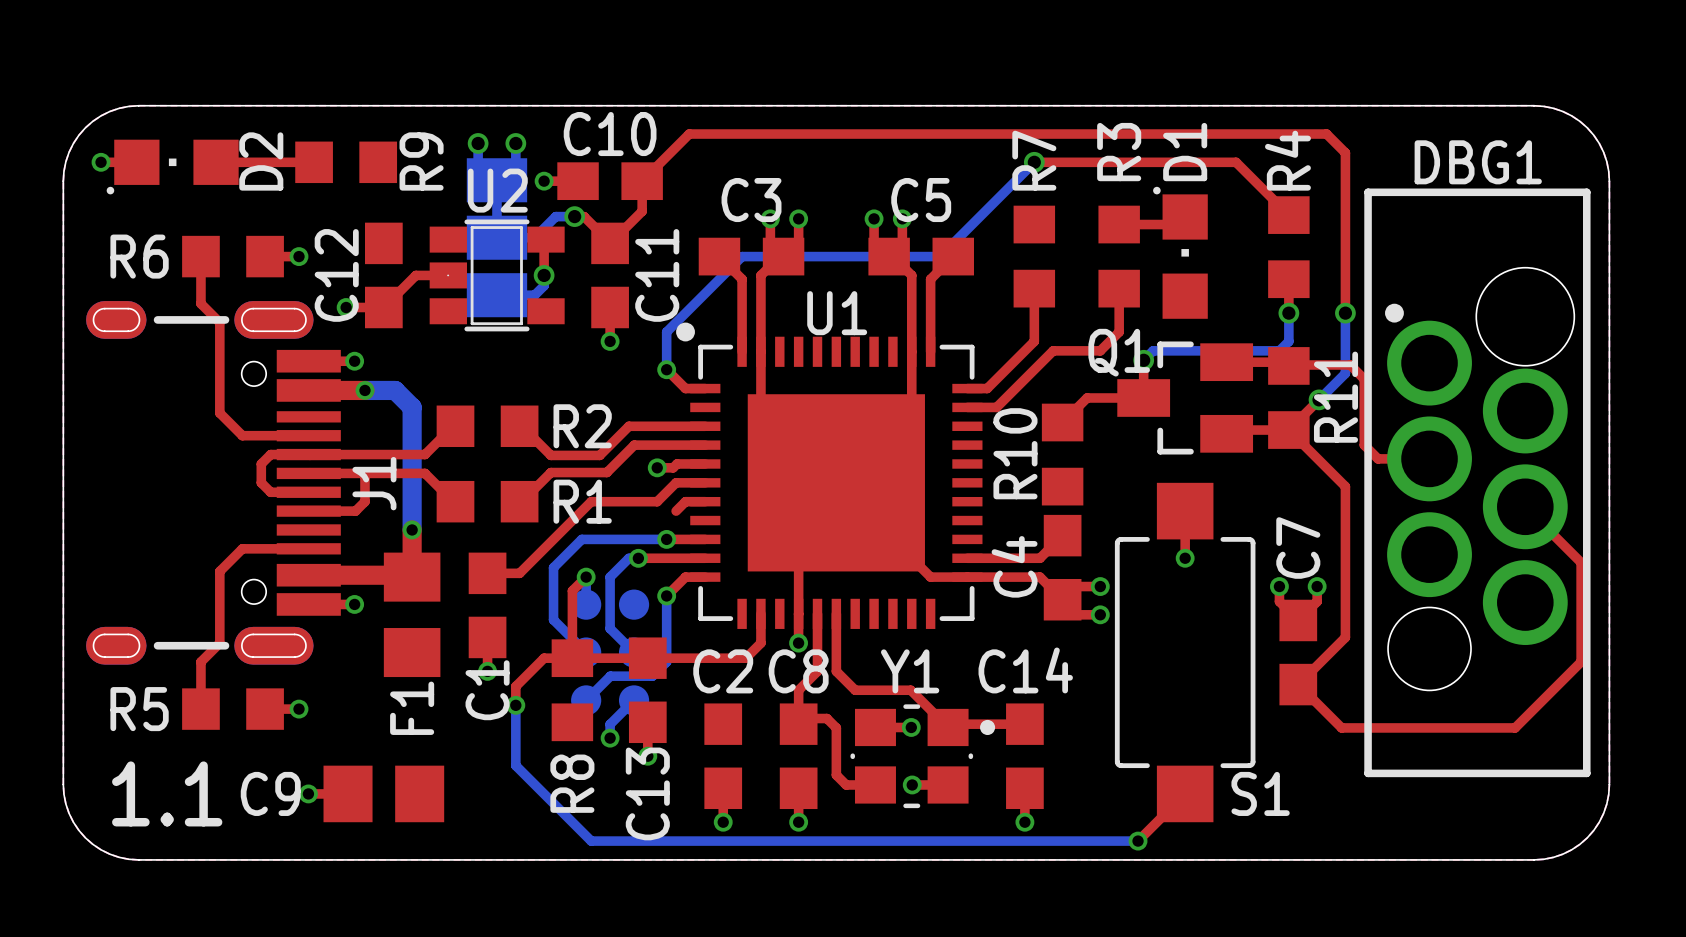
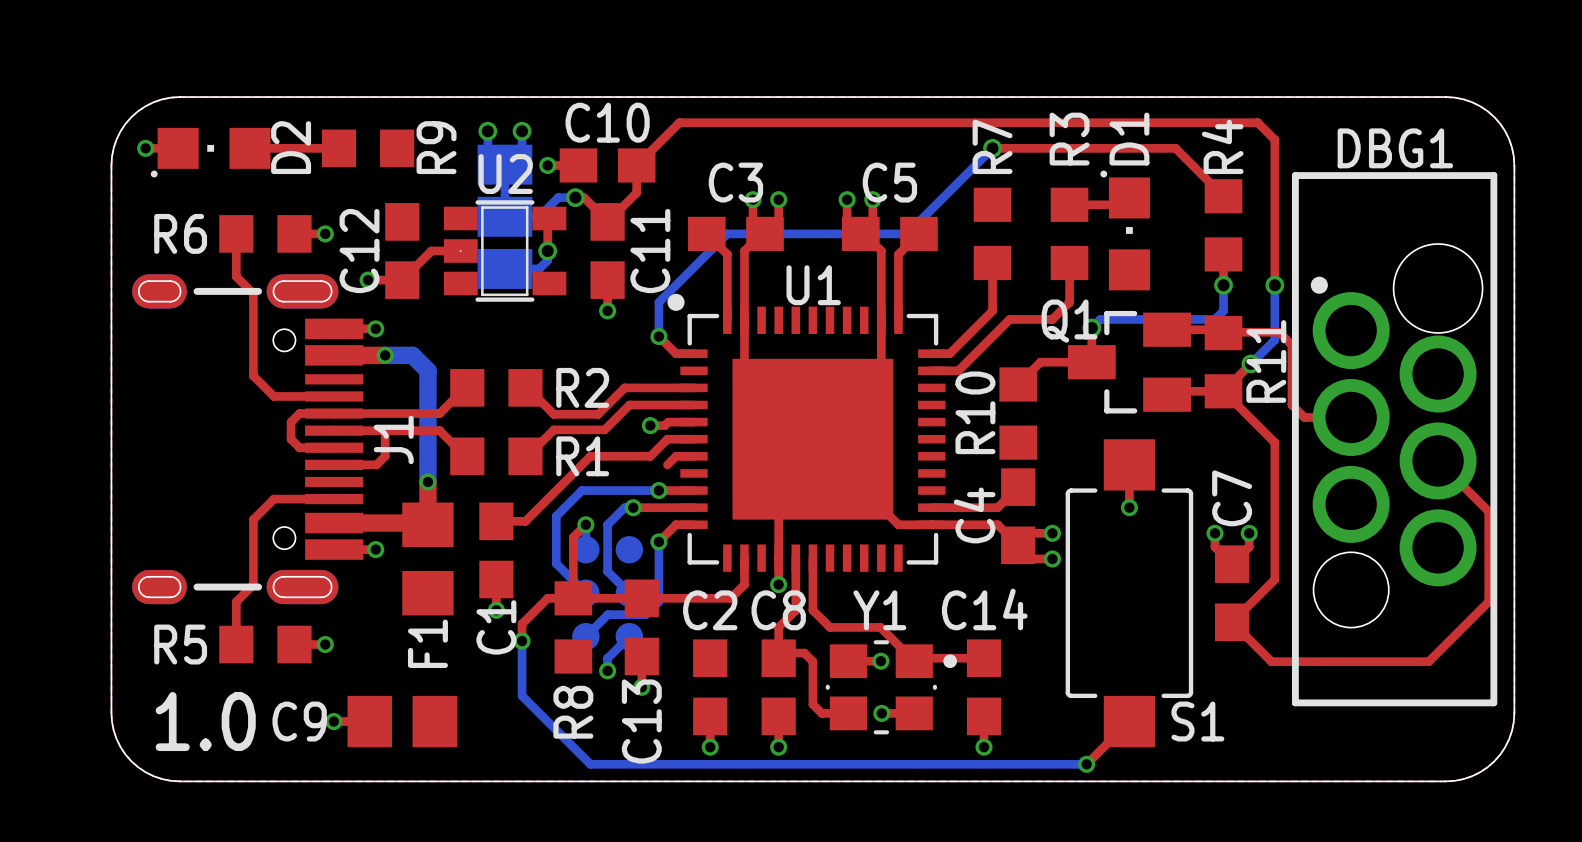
text: 1.1 (167, 793) -> 1.0 (205, 721)

